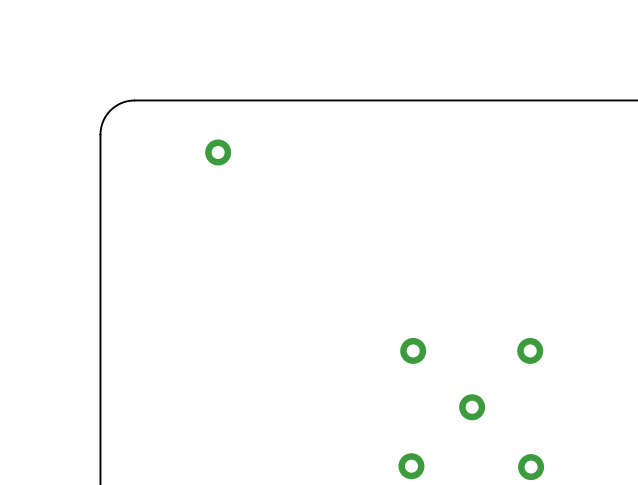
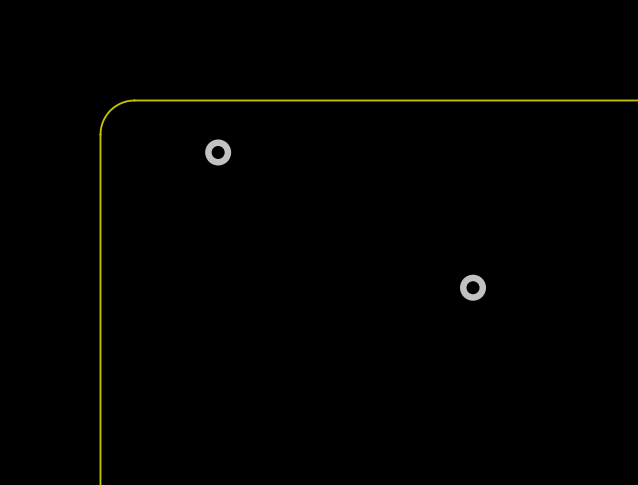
via: none -> (473, 287)
via: (413, 350) -> none
via: (530, 350) -> none
via: (472, 407) -> none
via: (411, 466) -> none
via: (531, 467) -> none

